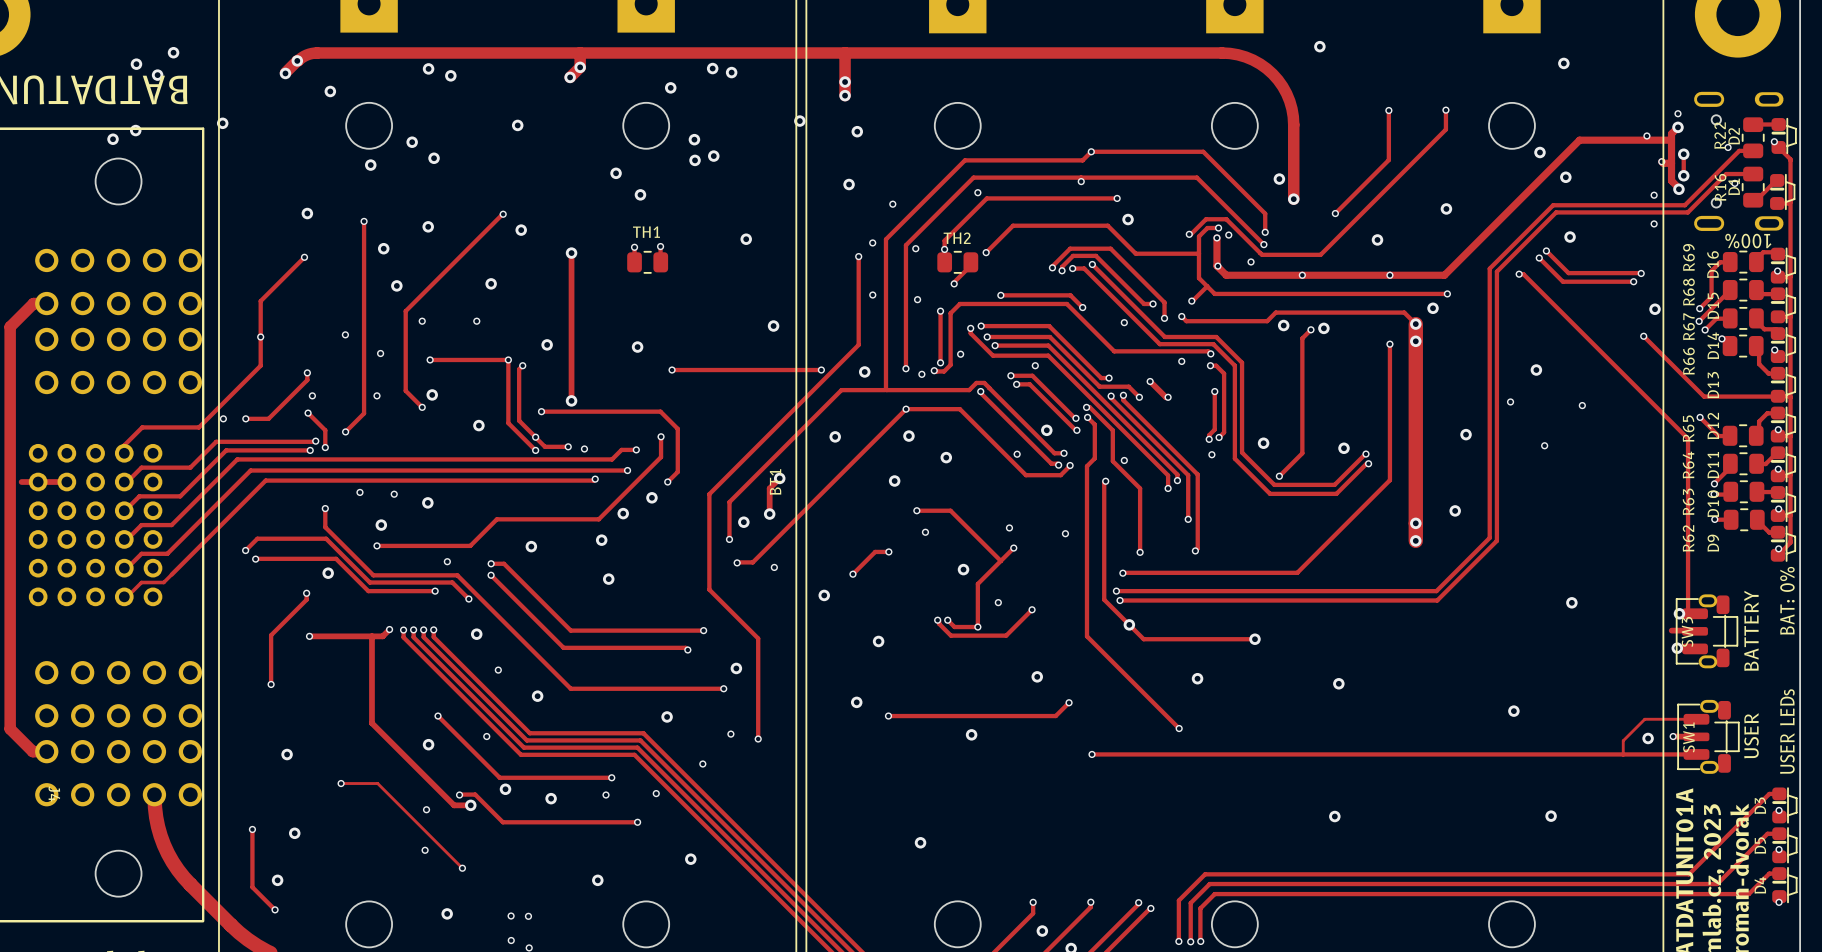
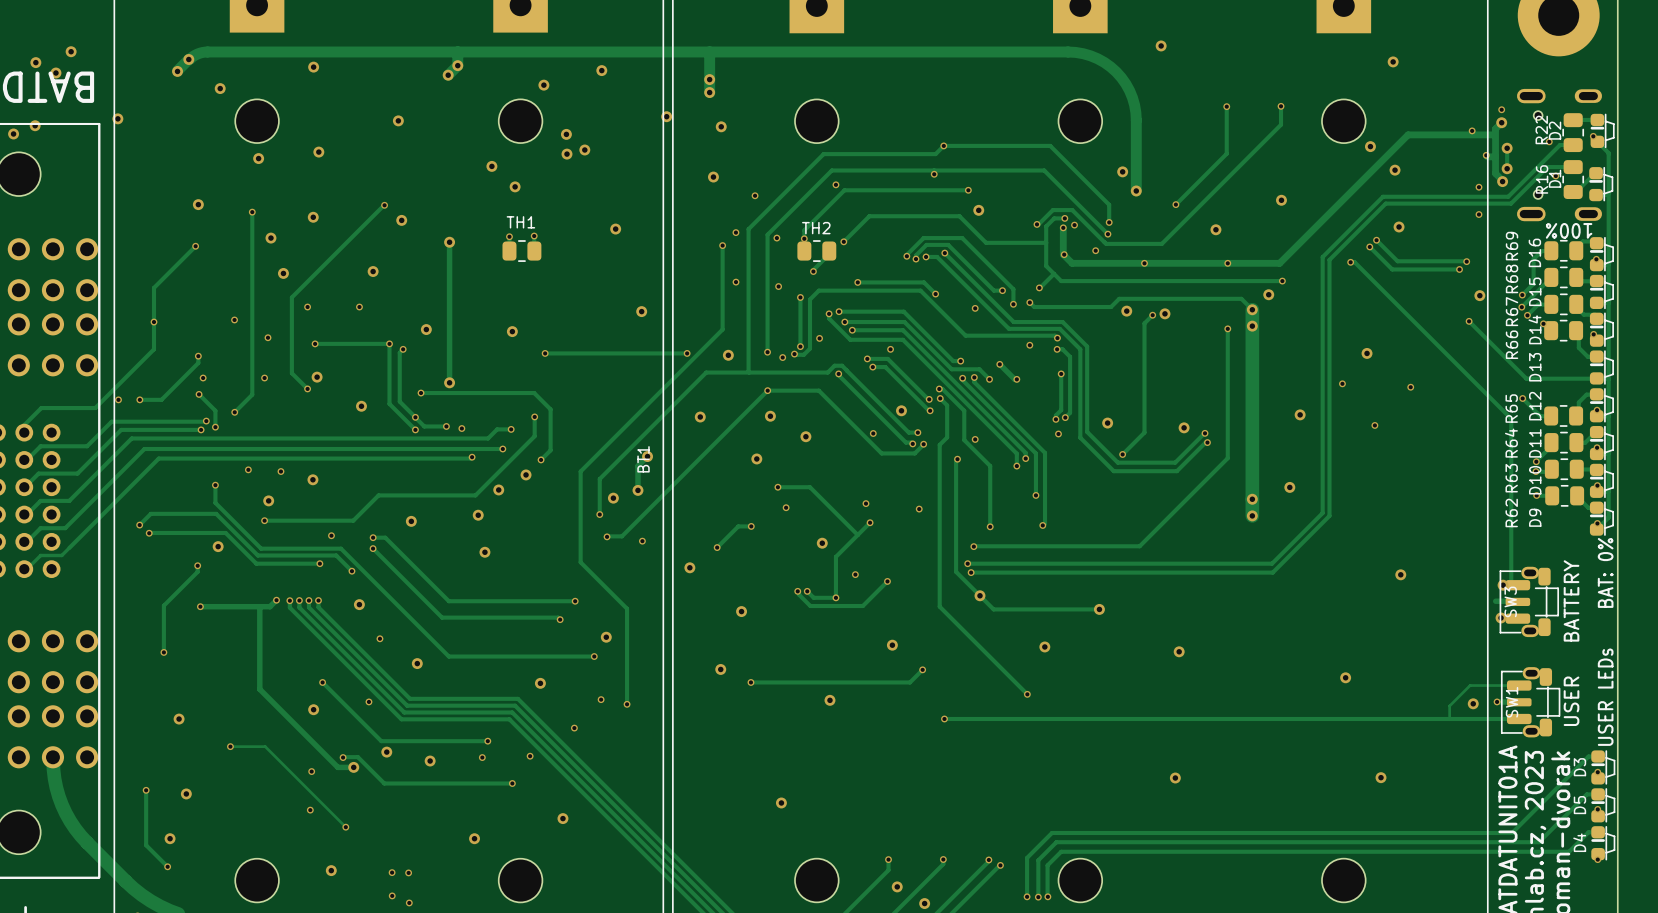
via: (712, 68) -> none
via: (450, 75) -> none
via: (412, 142) -> none

